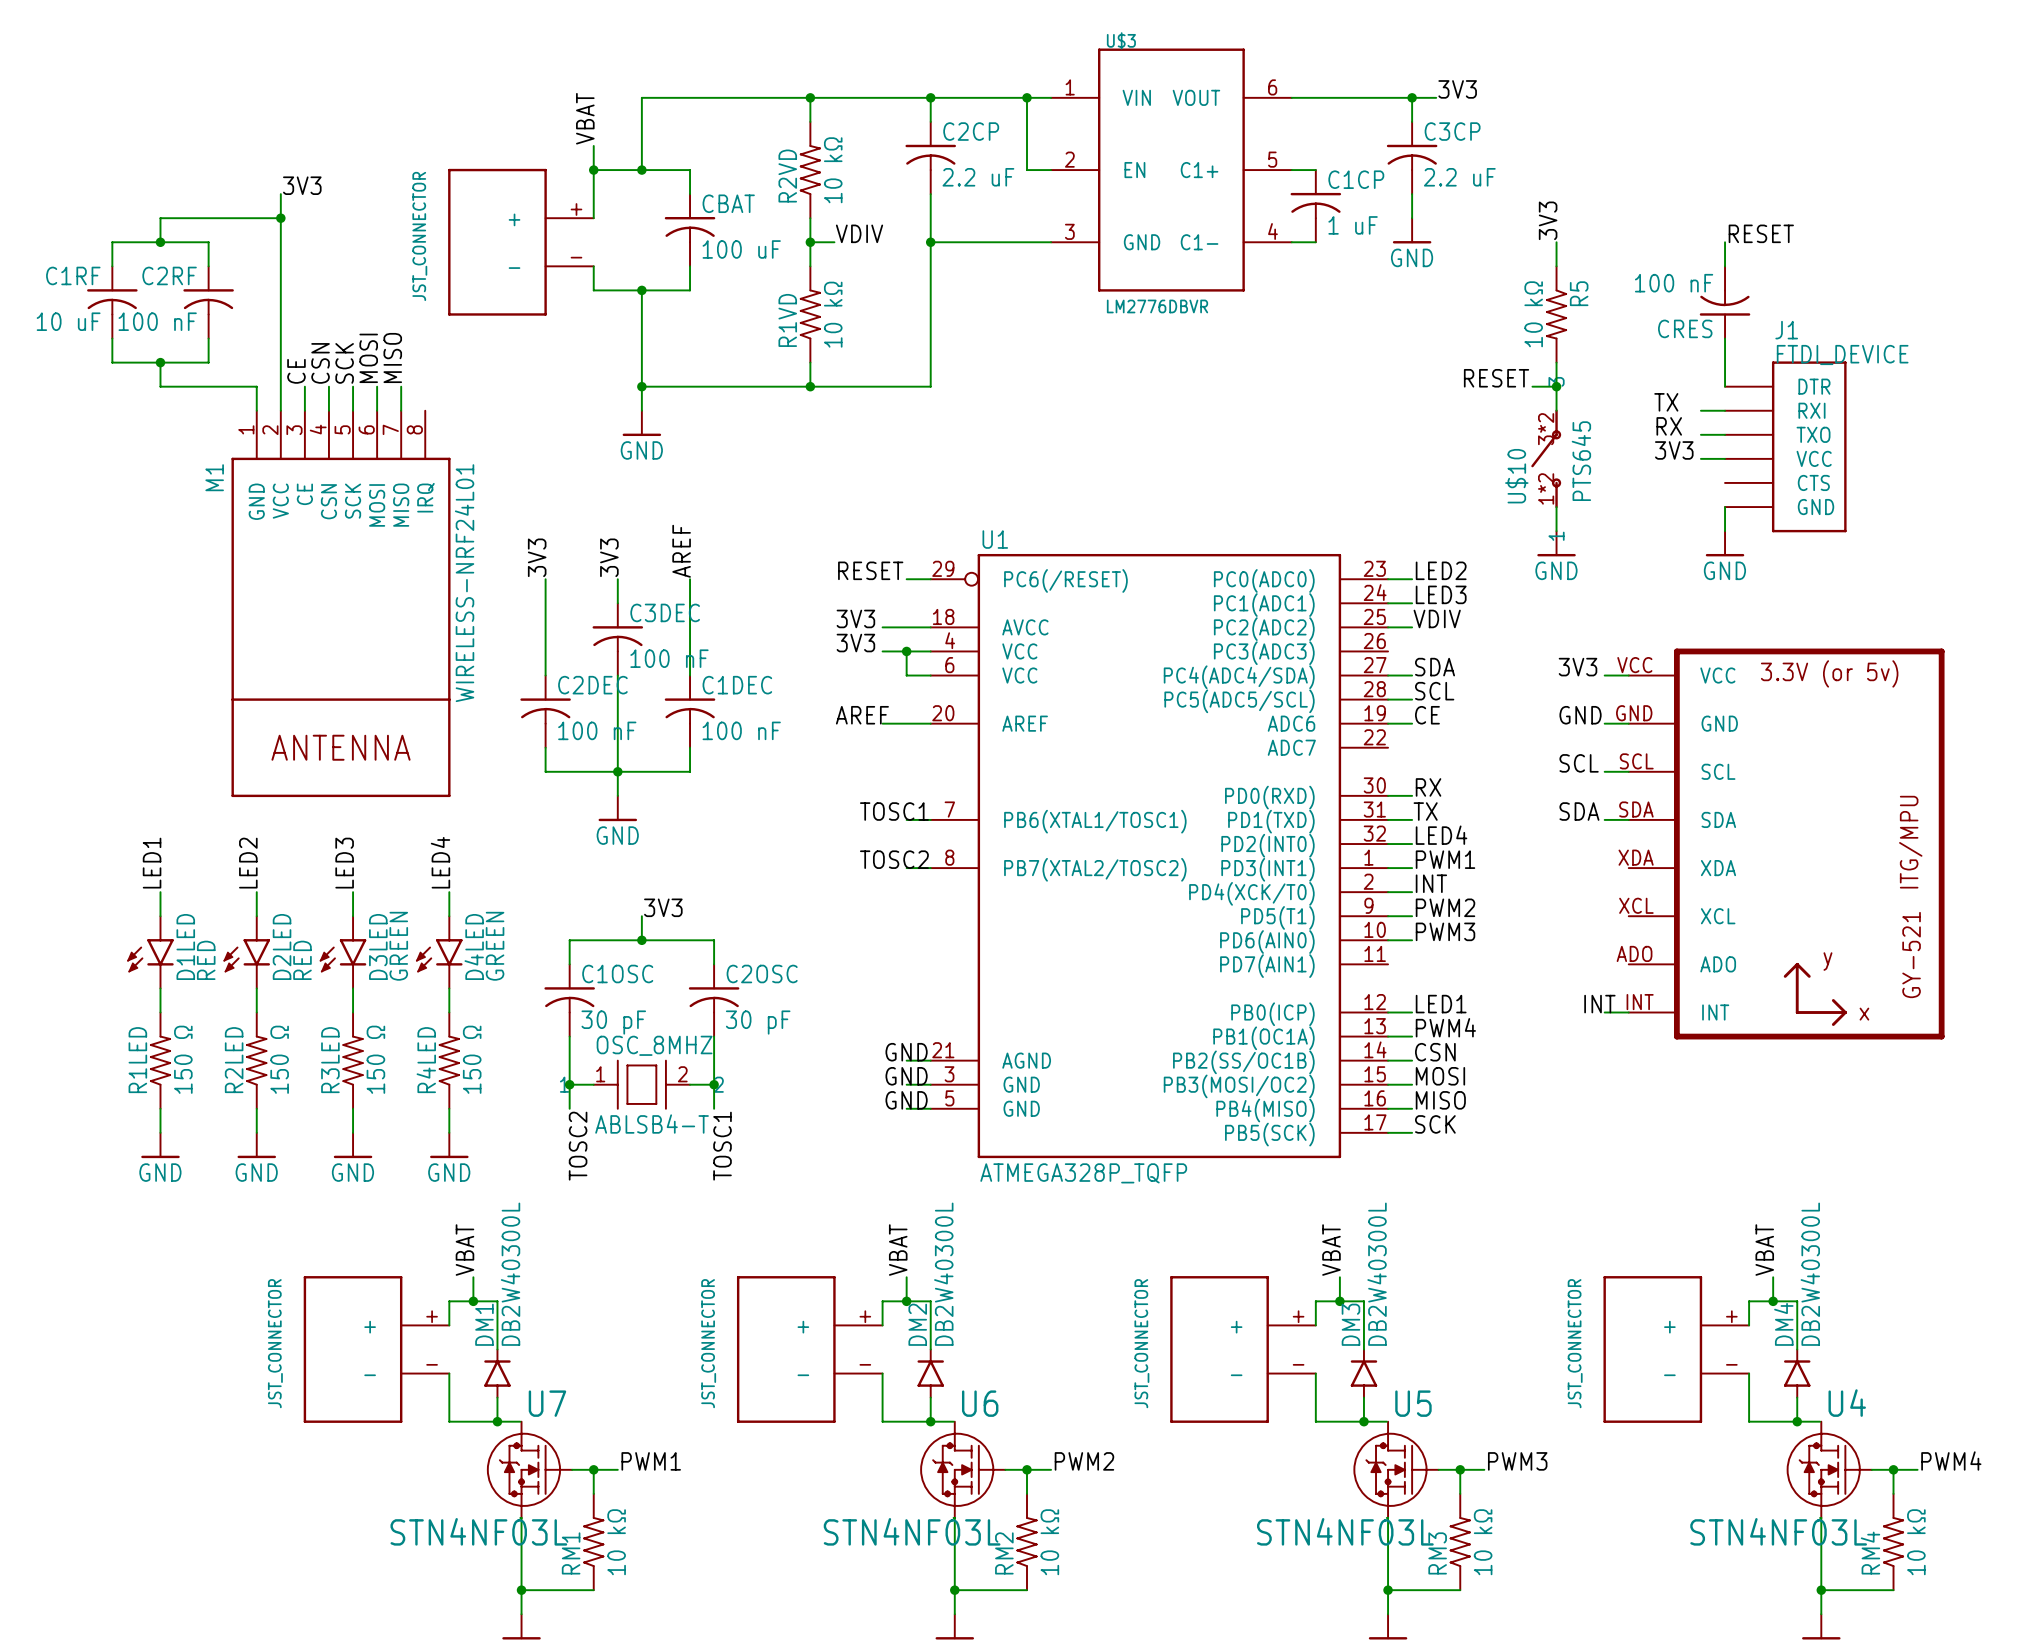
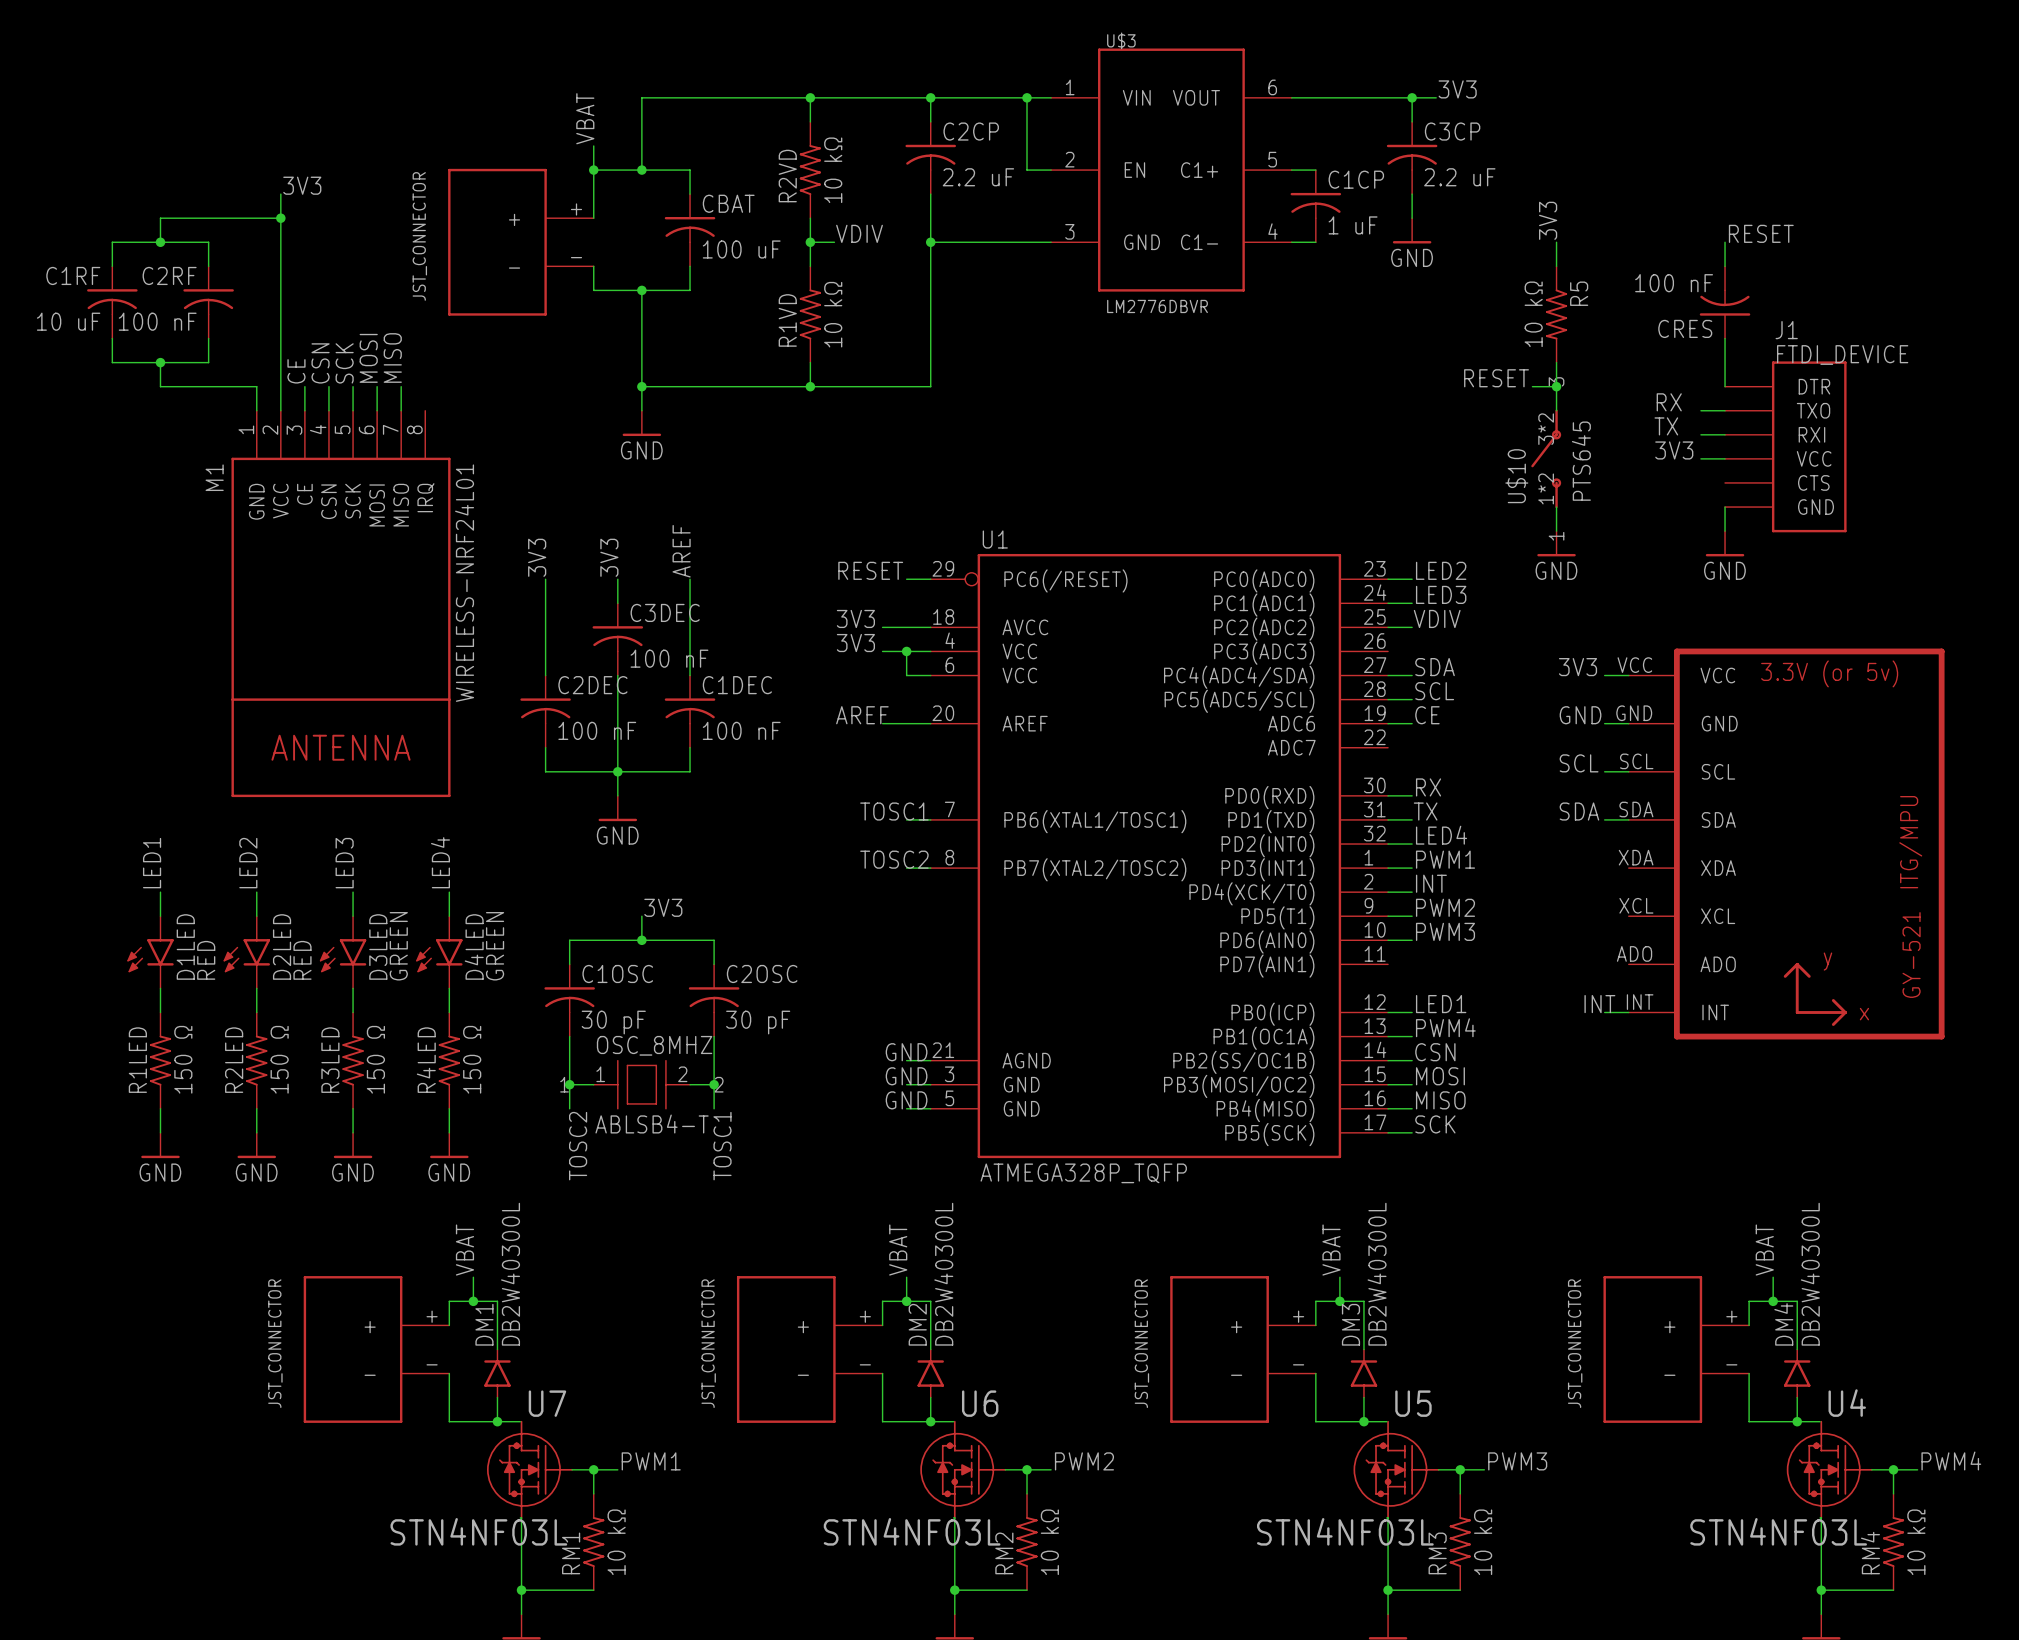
label: TX (1666, 402) -> RX (1669, 402)
J1 pin name: RXI (1811, 410) -> TXO (1813, 410)
label: RX (1669, 426) -> TX (1666, 426)
J1 pin name: TXO (1813, 434) -> RXI (1811, 434)

